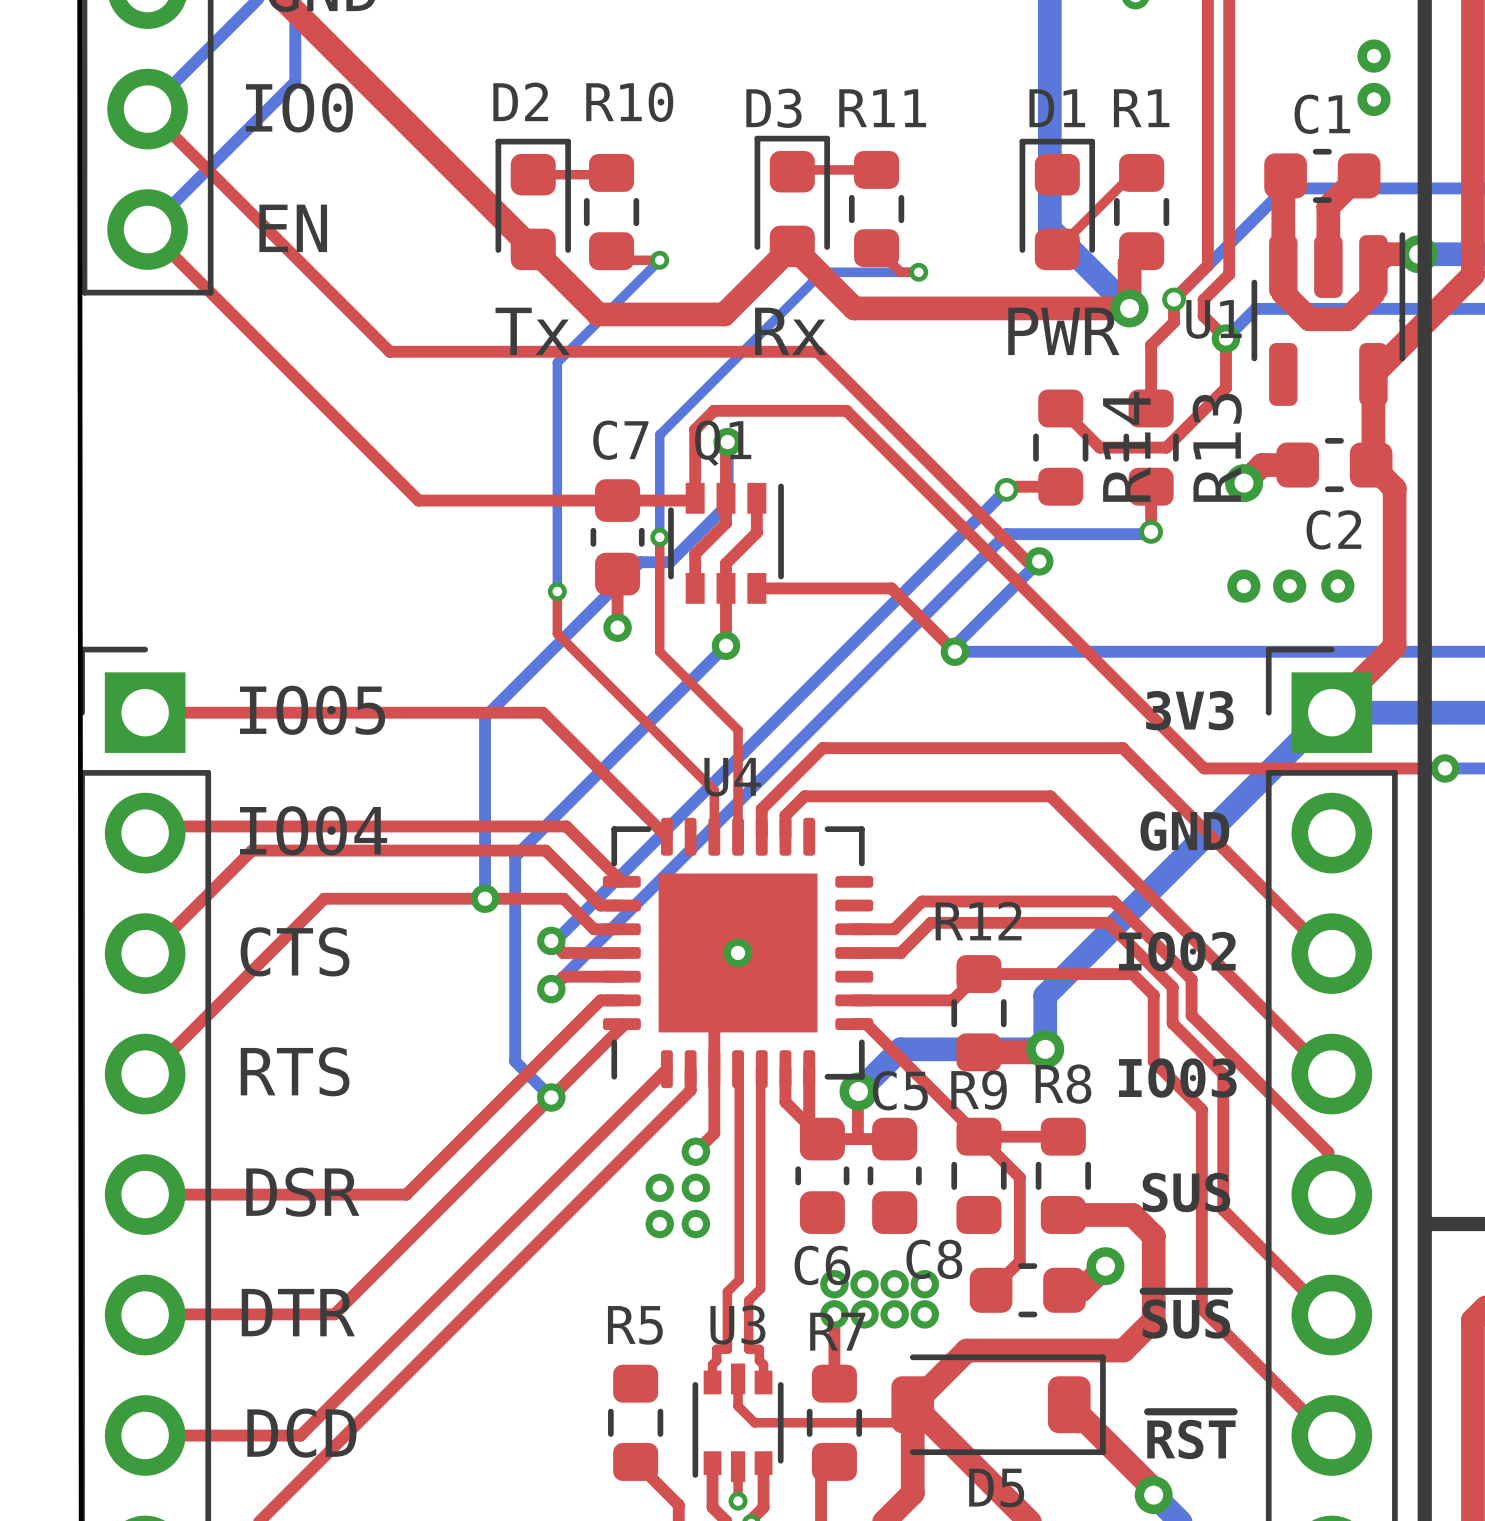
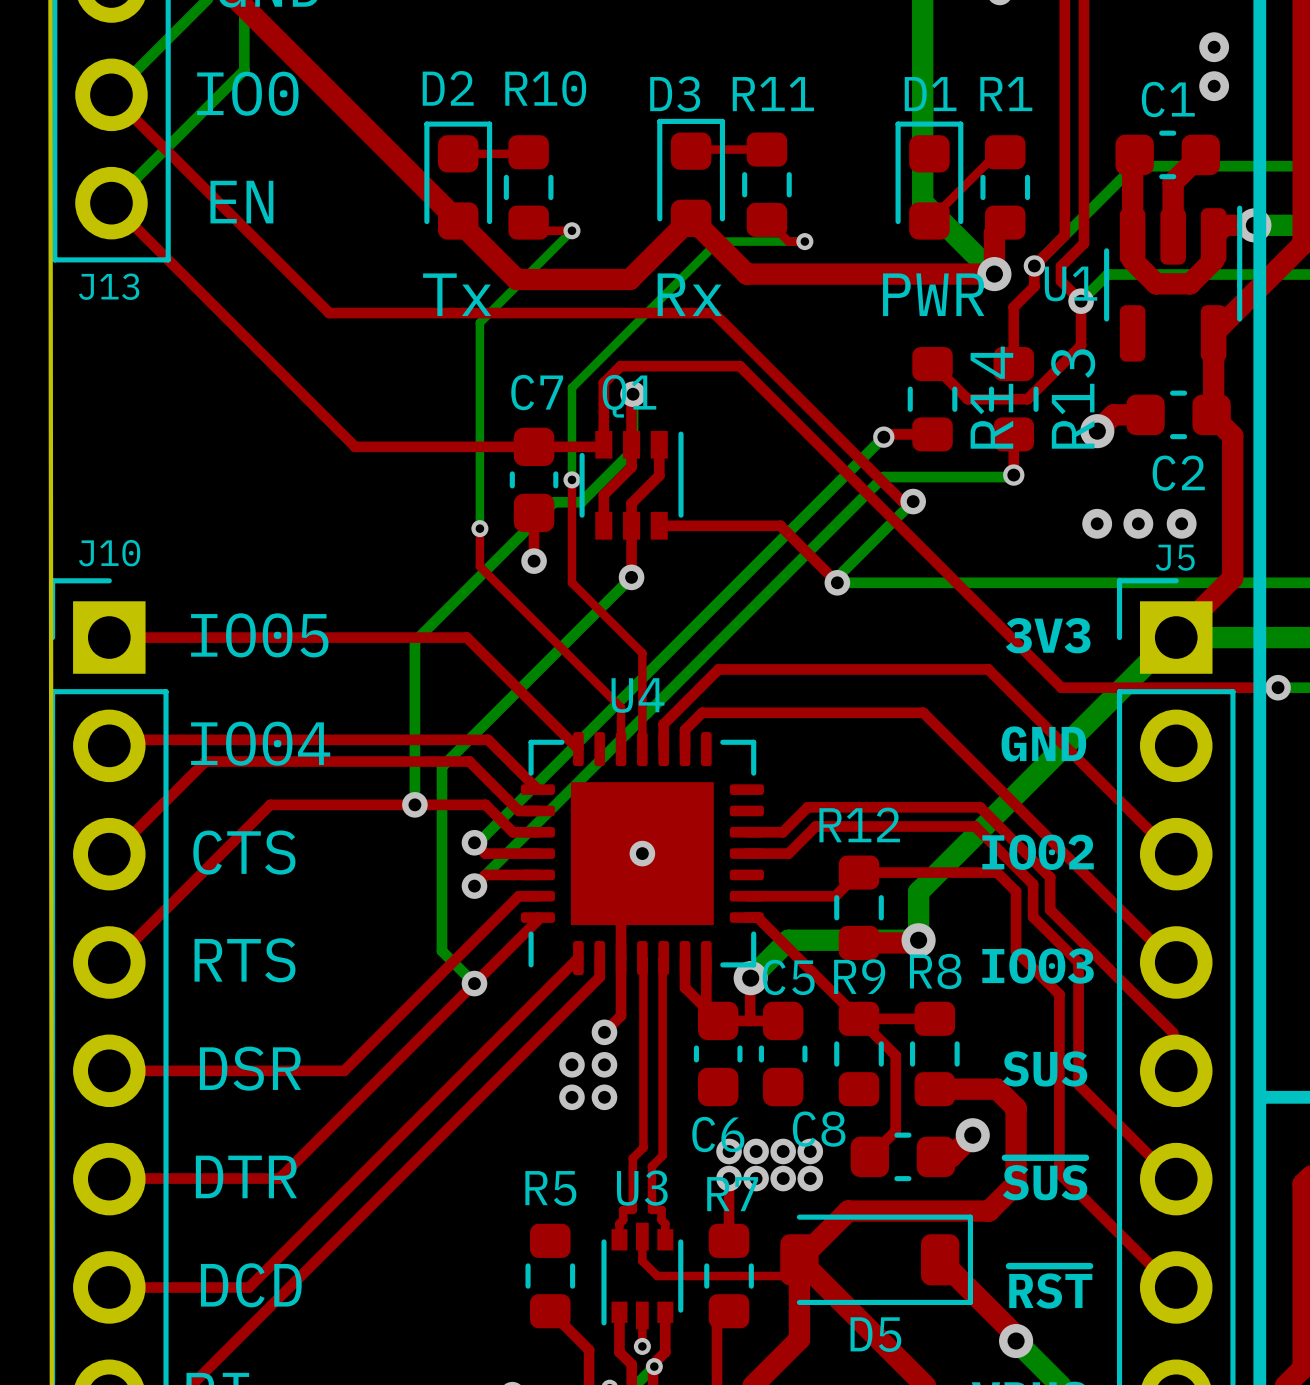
J13 name: none -> J13 (109, 286)
J10 name: none -> J10 (109, 553)
J5 name: none -> J5 (1175, 557)

